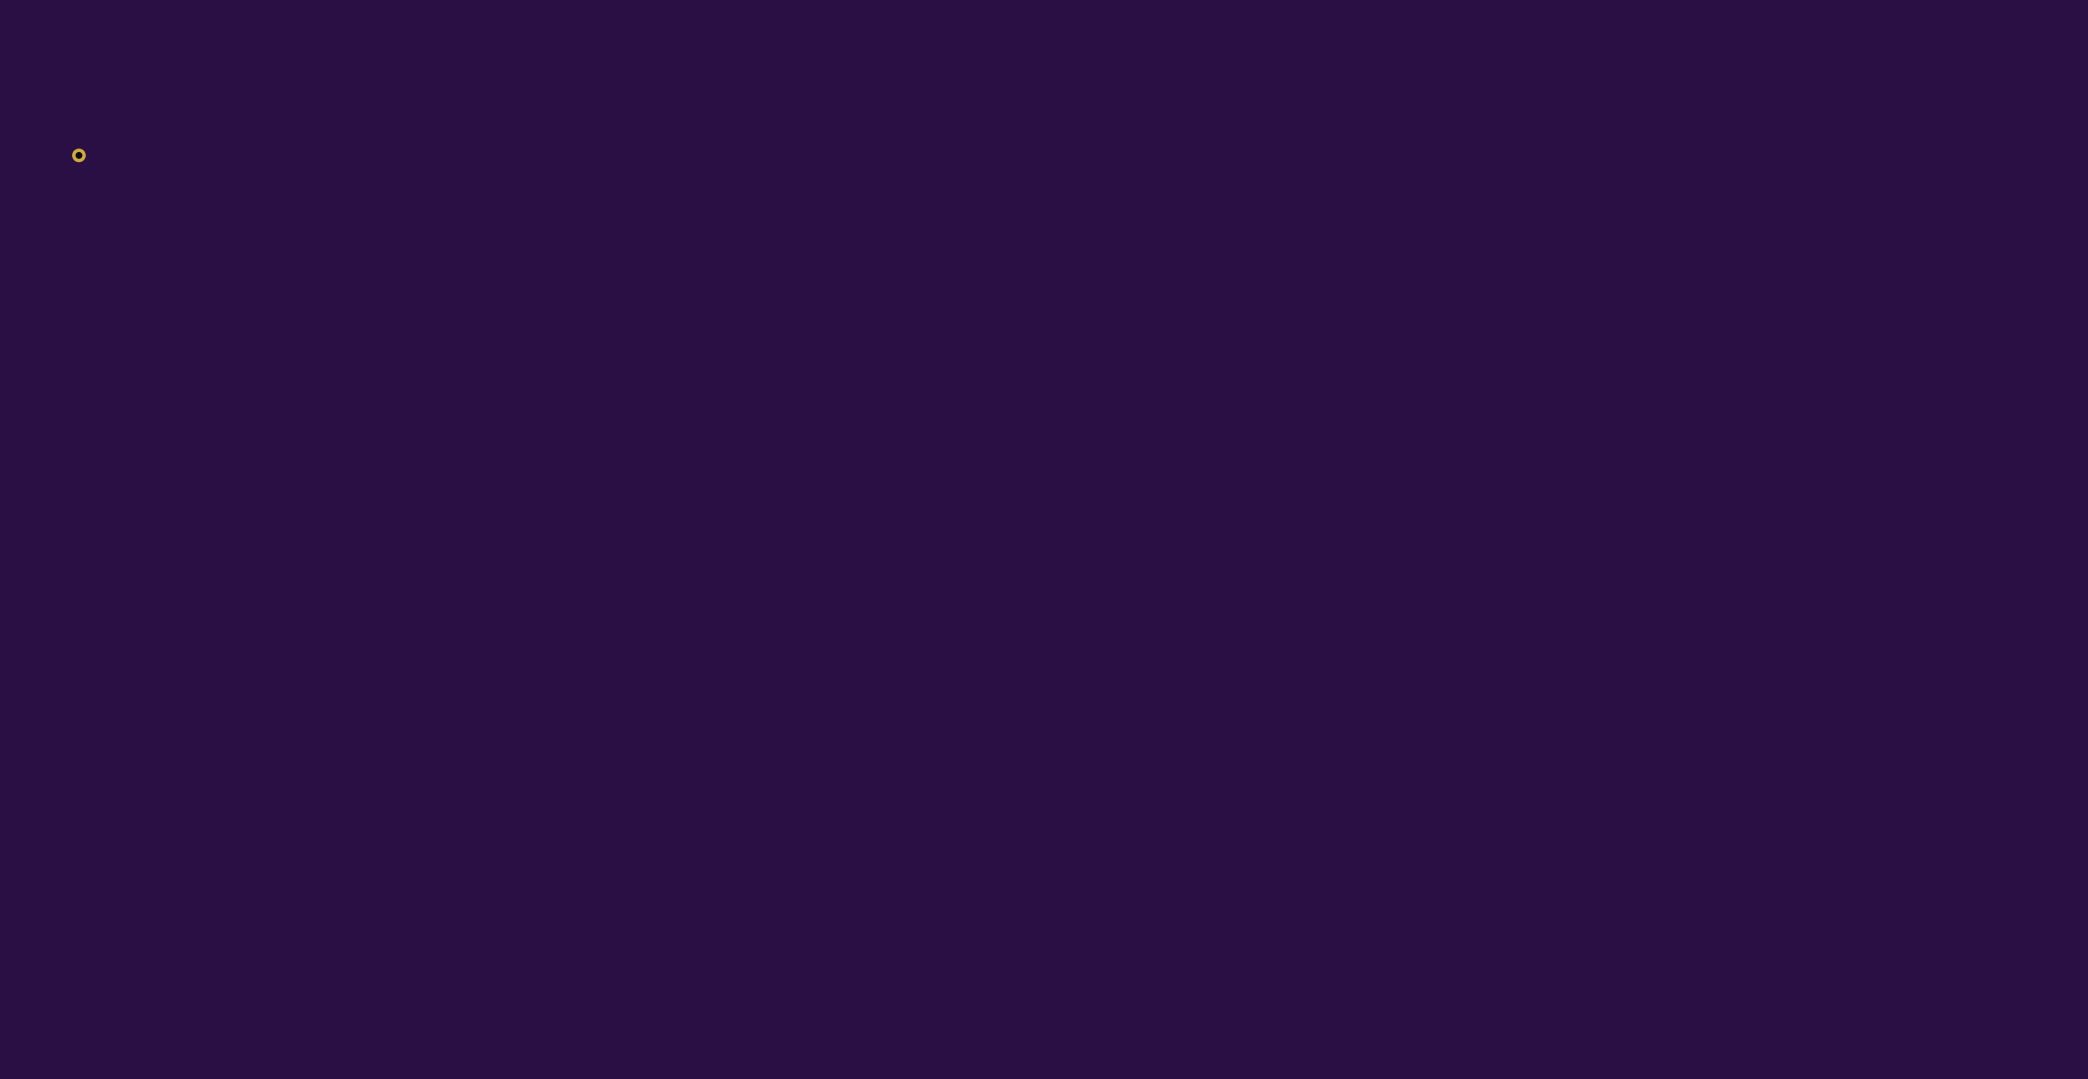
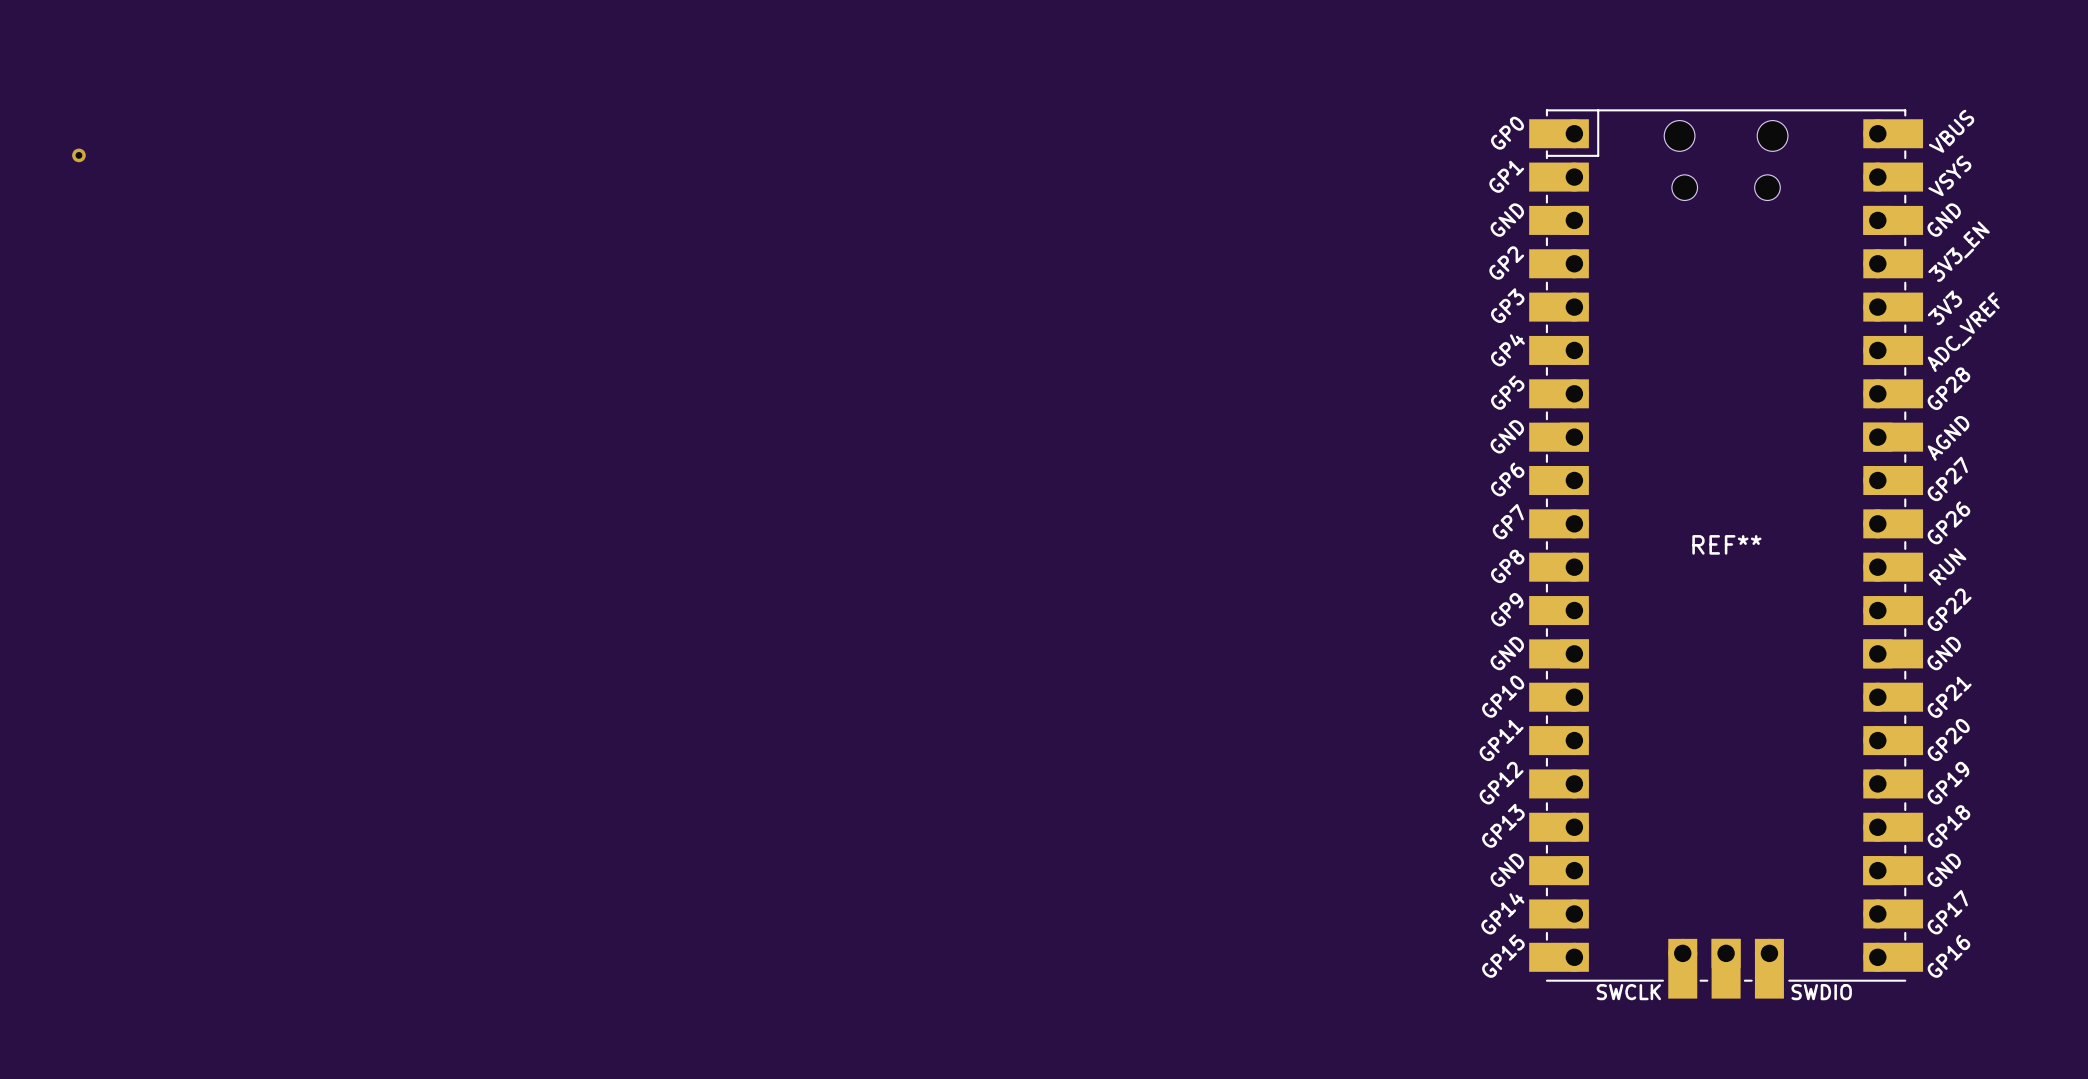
REF**: none -> (1726, 553)

